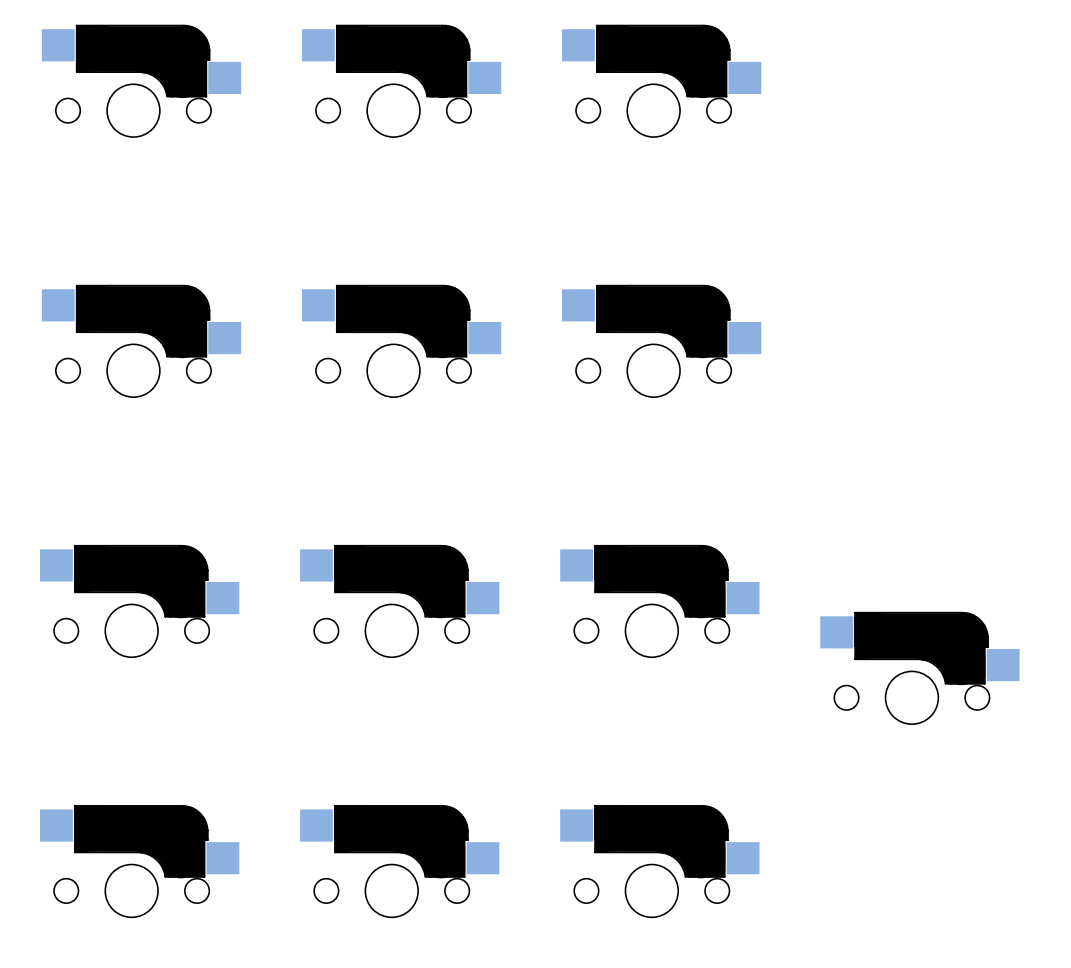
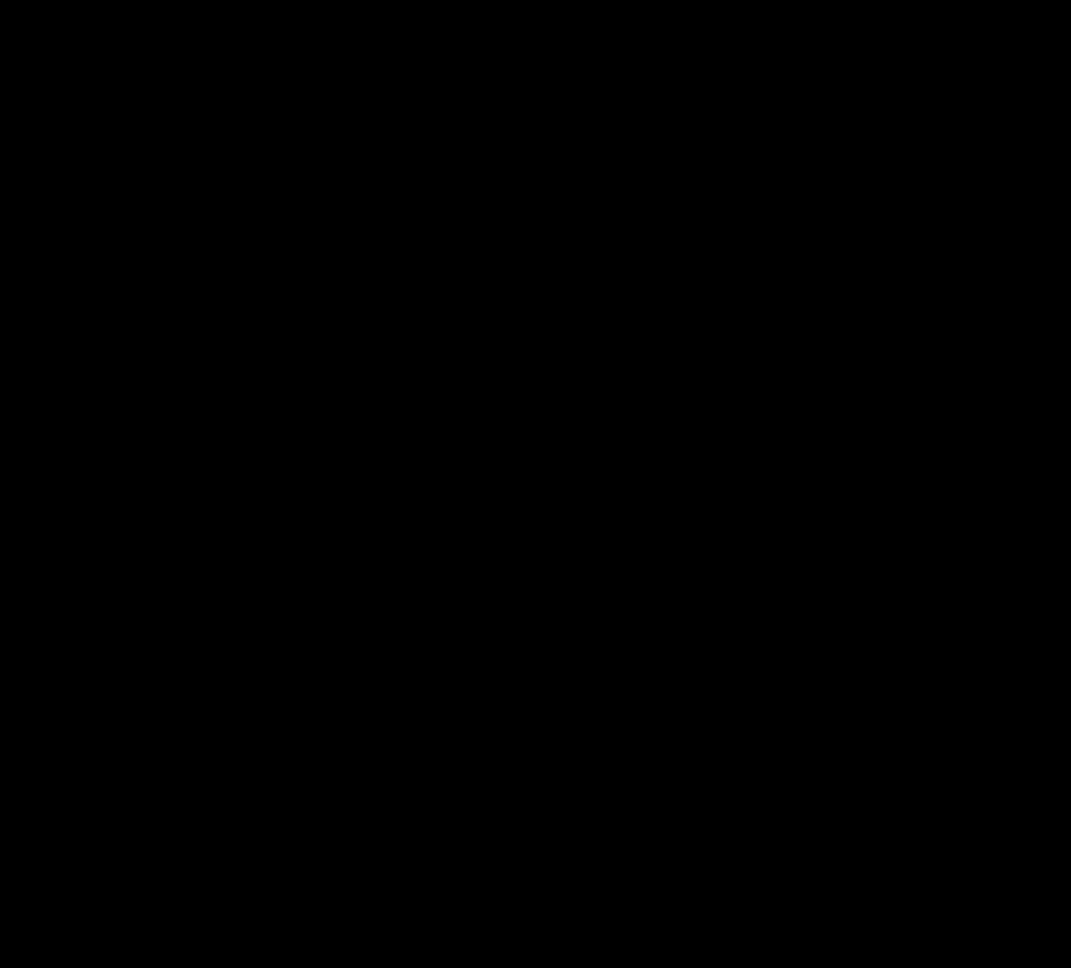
part: (141, 80) -> none
part: (401, 80) -> none
part: (661, 80) -> none
part: (141, 340) -> none
part: (401, 340) -> none
part: (661, 340) -> none
part: (139, 601) -> none
part: (399, 601) -> none
part: (659, 601) -> none
part: (919, 668) -> none
part: (139, 861) -> none
part: (399, 861) -> none
part: (659, 861) -> none

